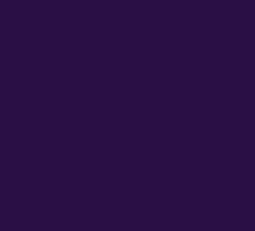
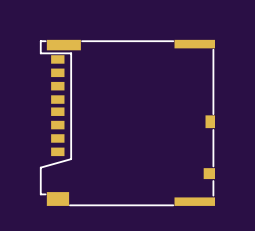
part: none -> (127, 123)

